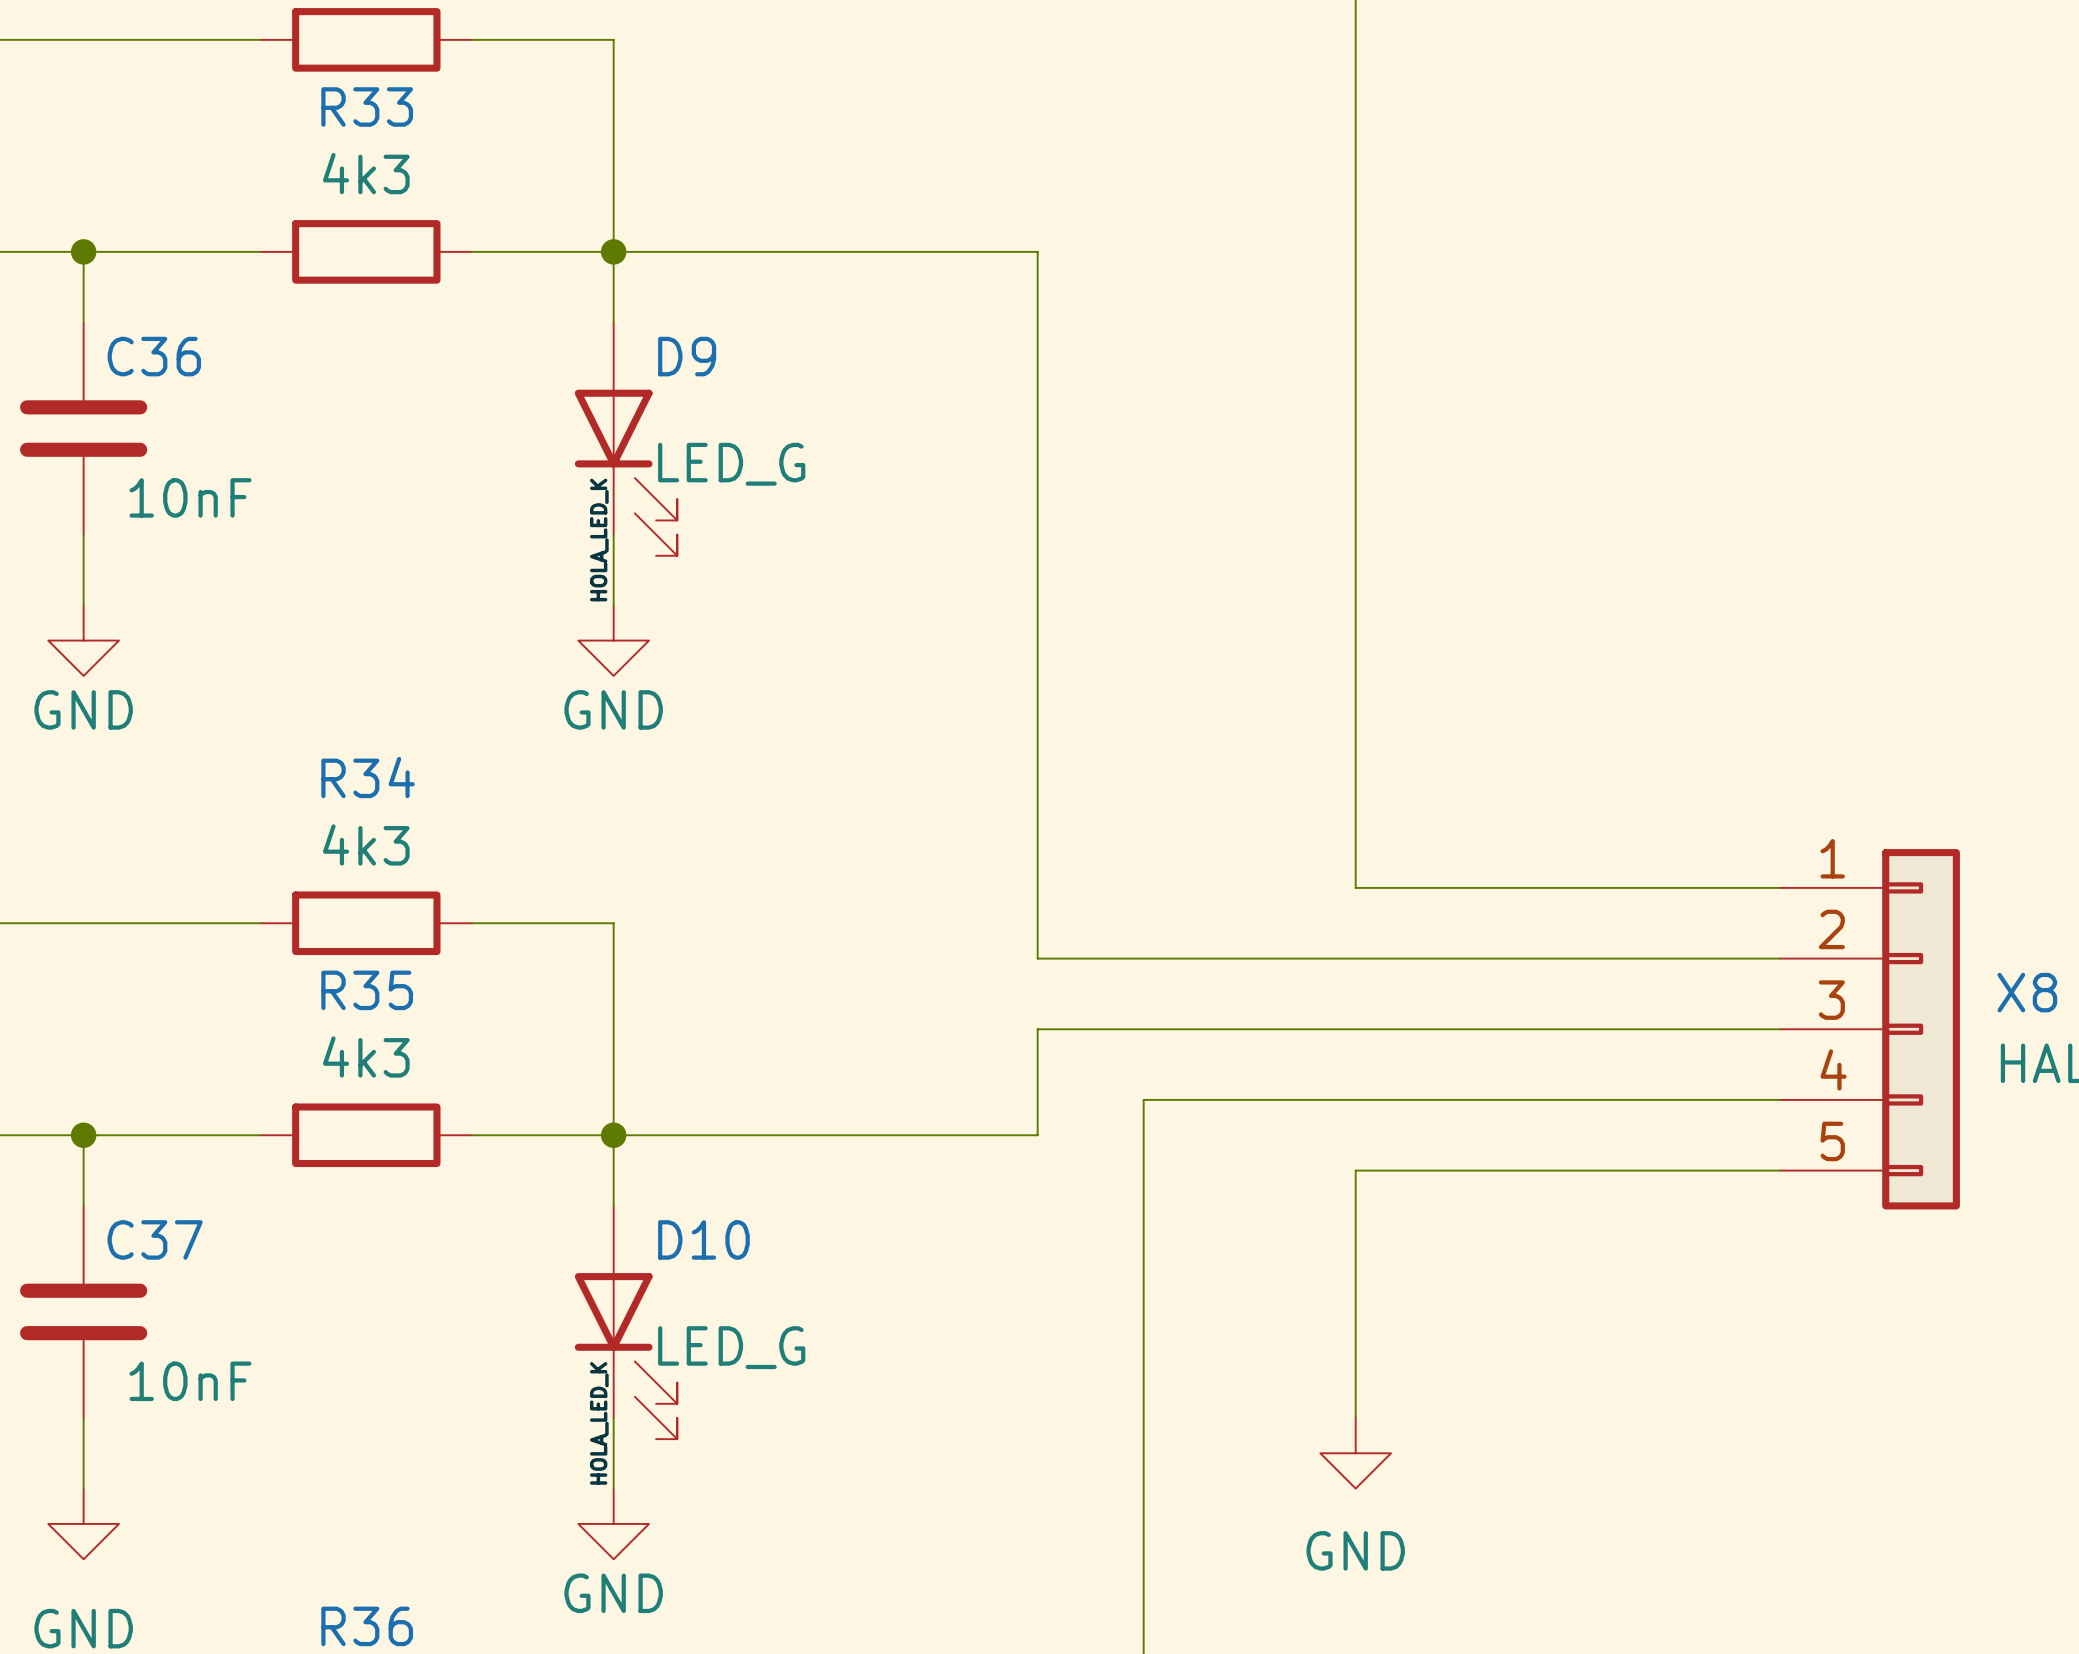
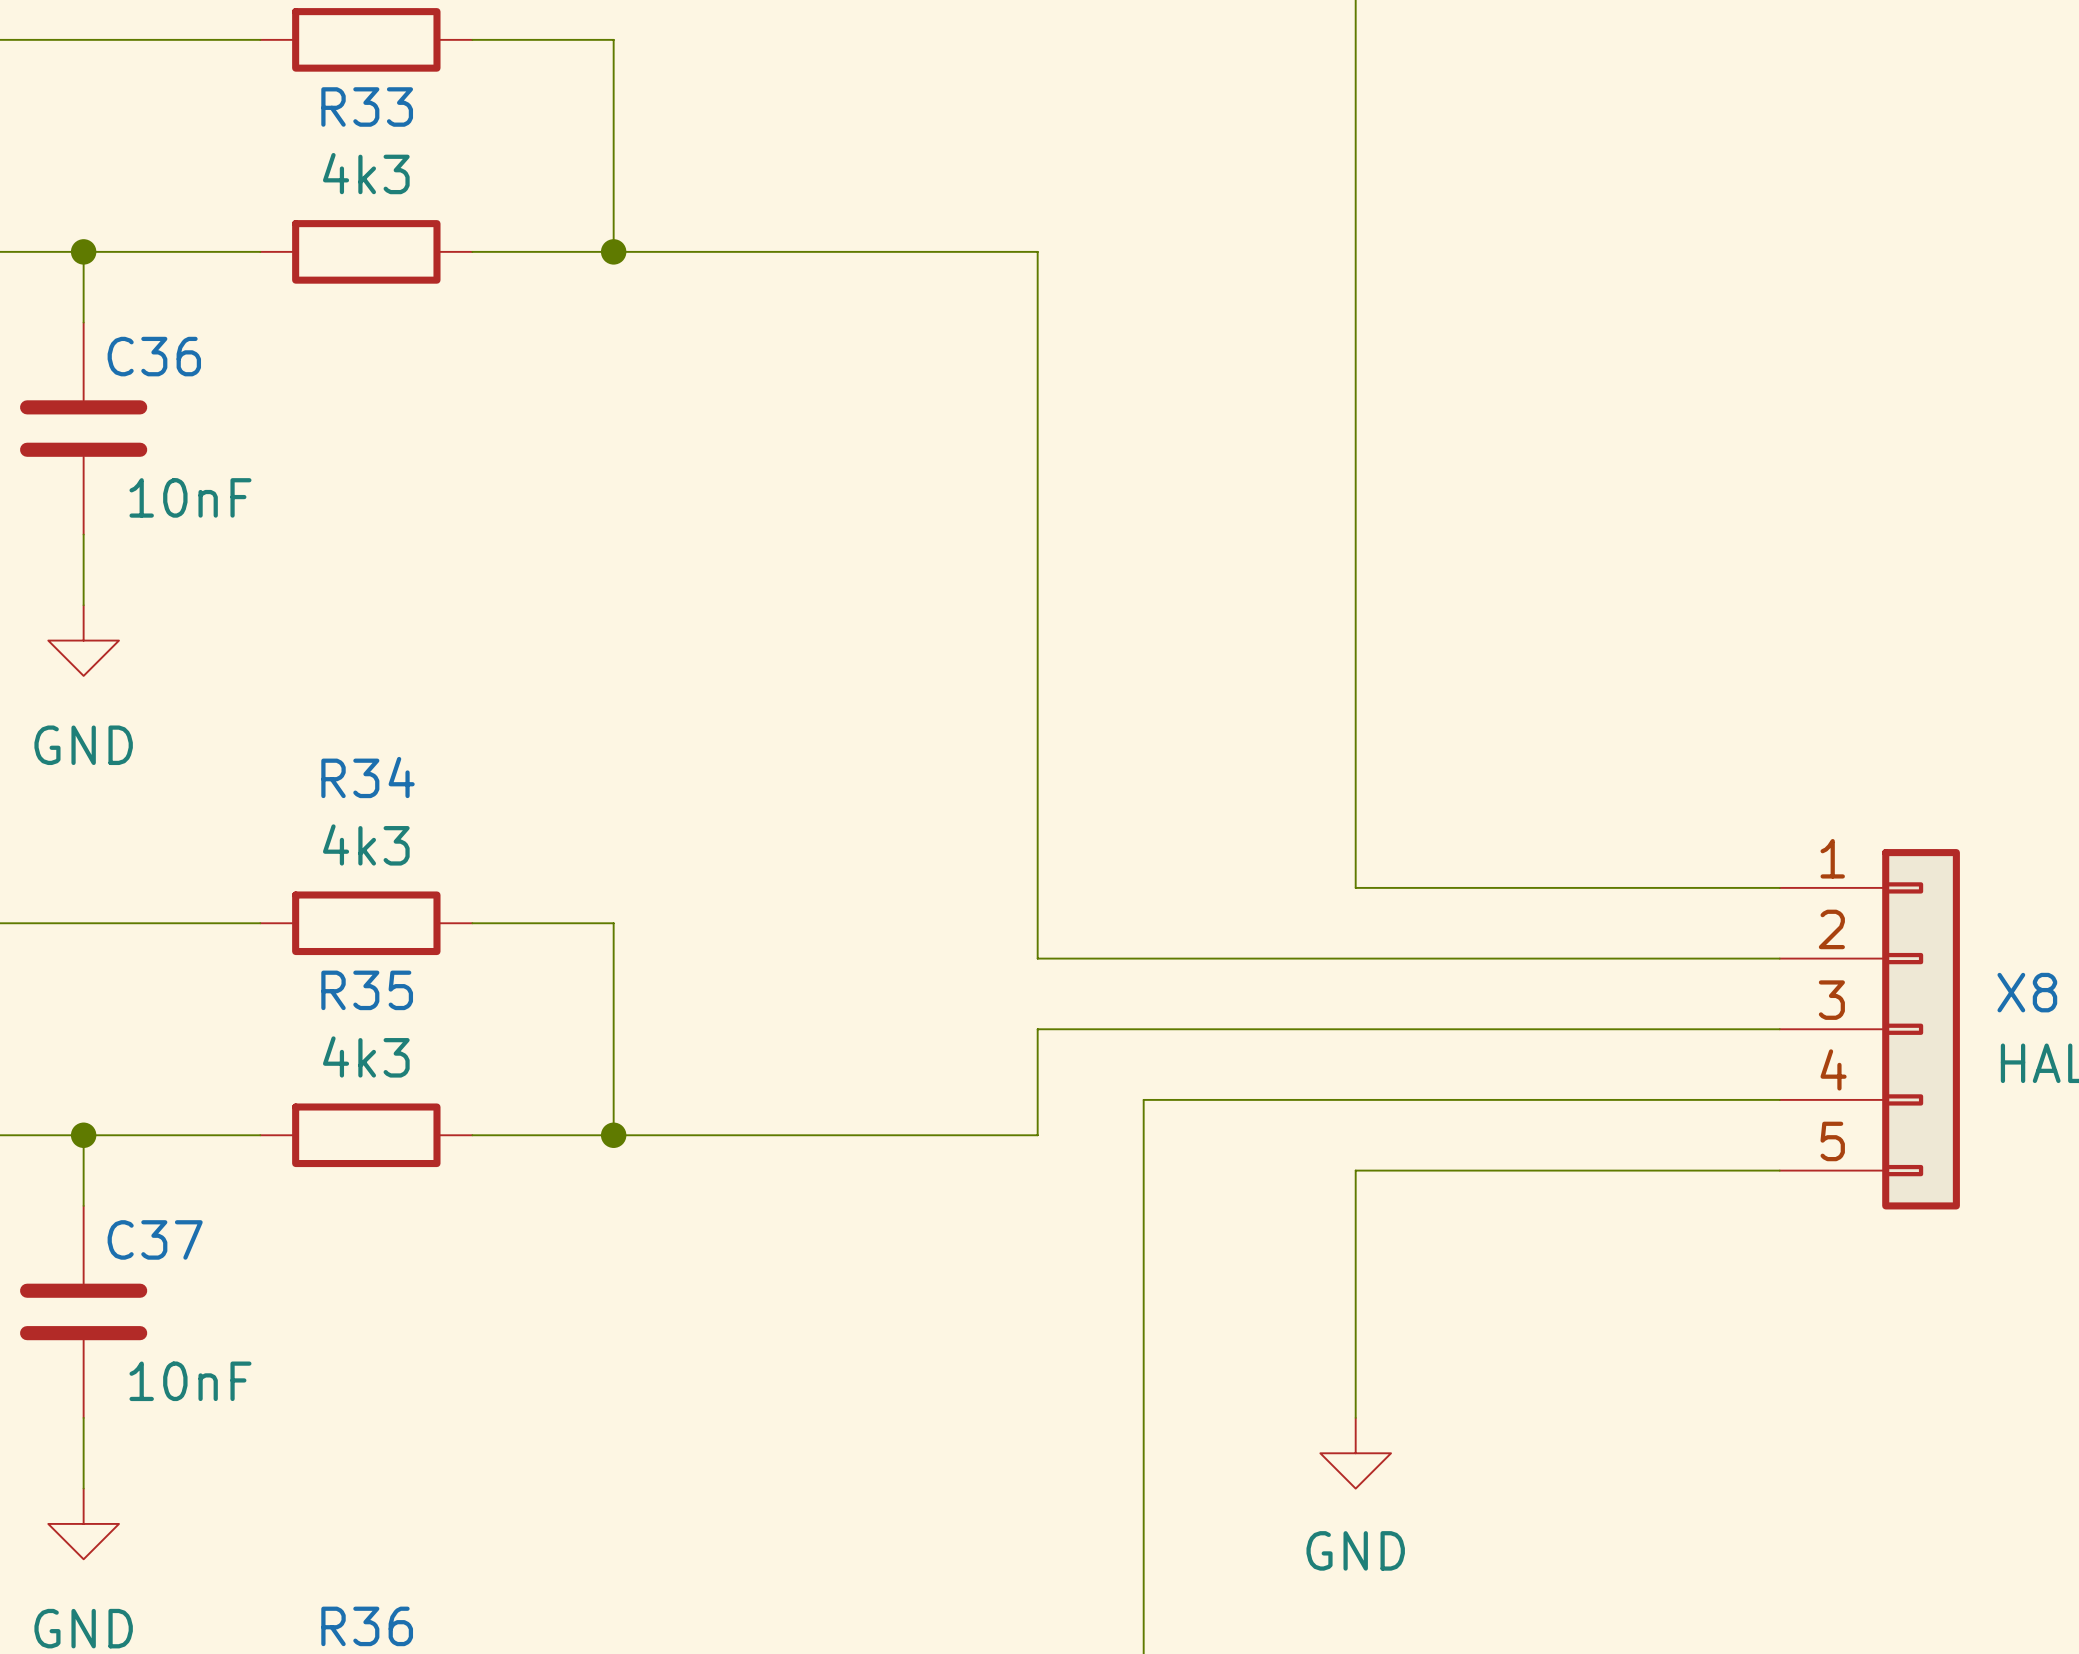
wire: (613, 251) (613, 322) -> none
D9: LED_G (626, 439) -> none
wire: (613, 534) (613, 605) -> none
label: HOLA_LED_K (599, 540) -> none
power symbol: GND (613, 640) -> none
power symbol text position: GND (83, 709) -> GND (83, 745)
wire: (613, 1135) (613, 1205) -> none
D10: LED_G (626, 1322) -> none
wire: (613, 1417) (613, 1488) -> none
label: HOLA_LED_K (599, 1423) -> none
power symbol: GND (613, 1523) -> none

